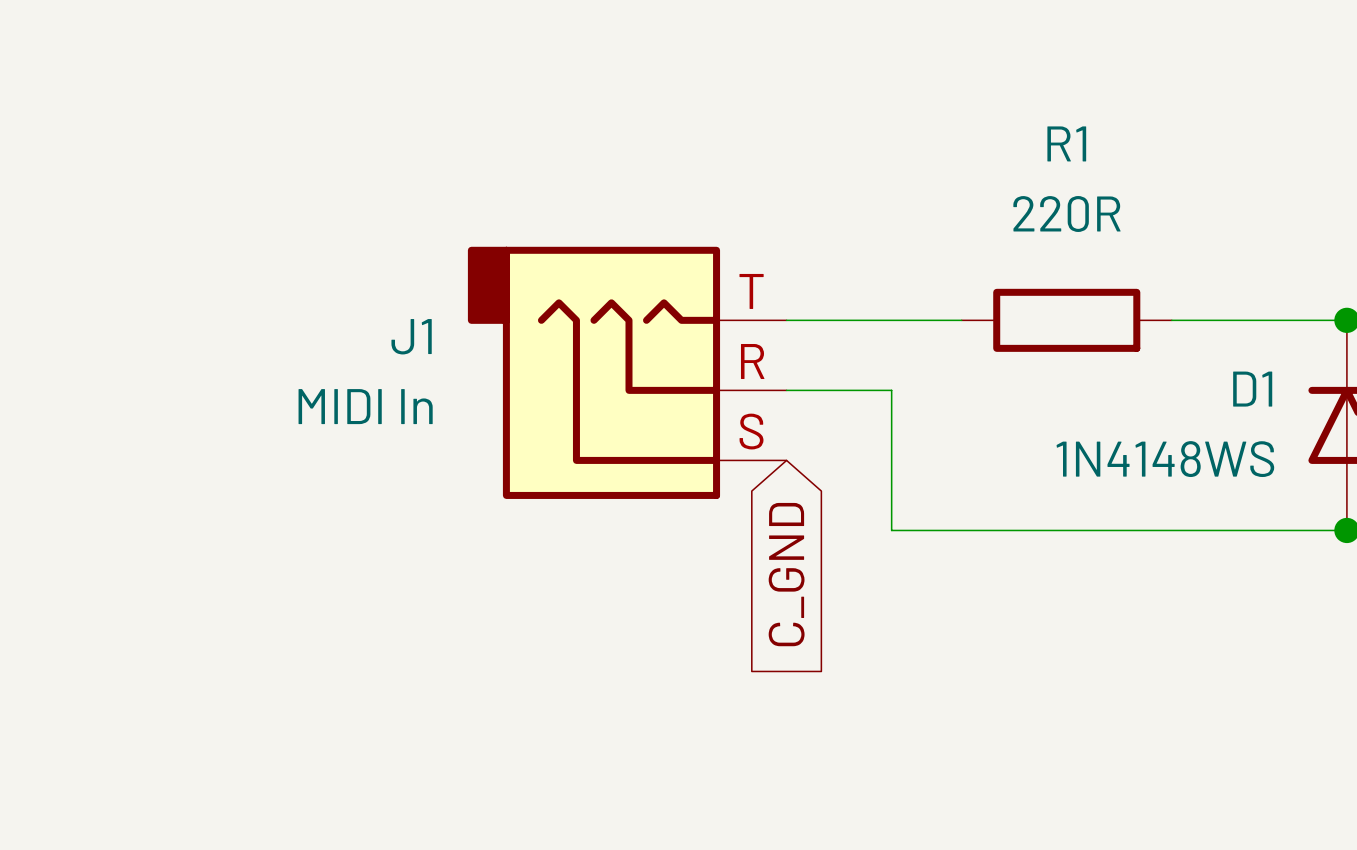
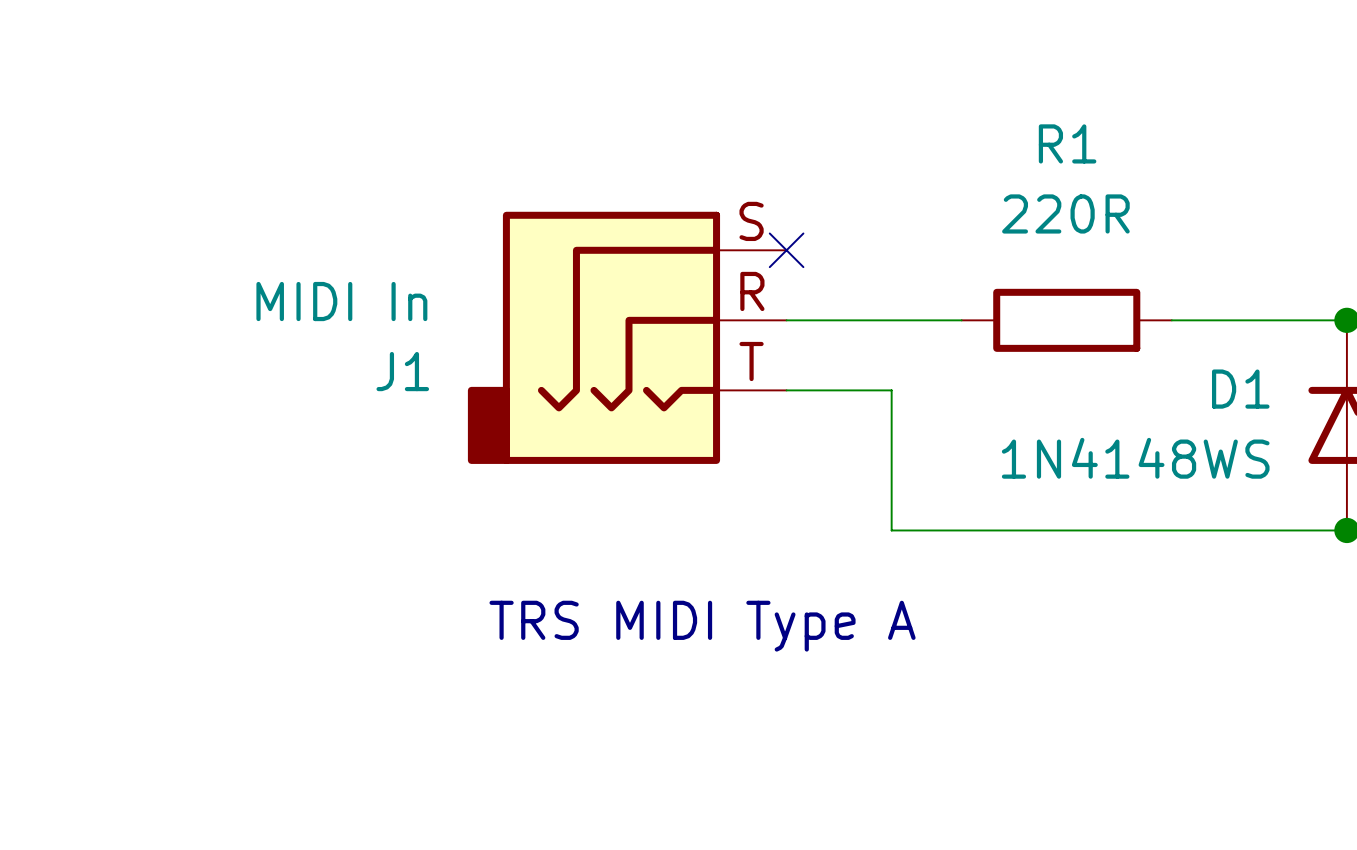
no-connect mark: none -> (786, 250)
J1 flip: as is (593, 372) -> up-down (593, 337)
global label: C_GND (786, 574) -> none
text: none -> TRS MIDI Type A (702, 626)

